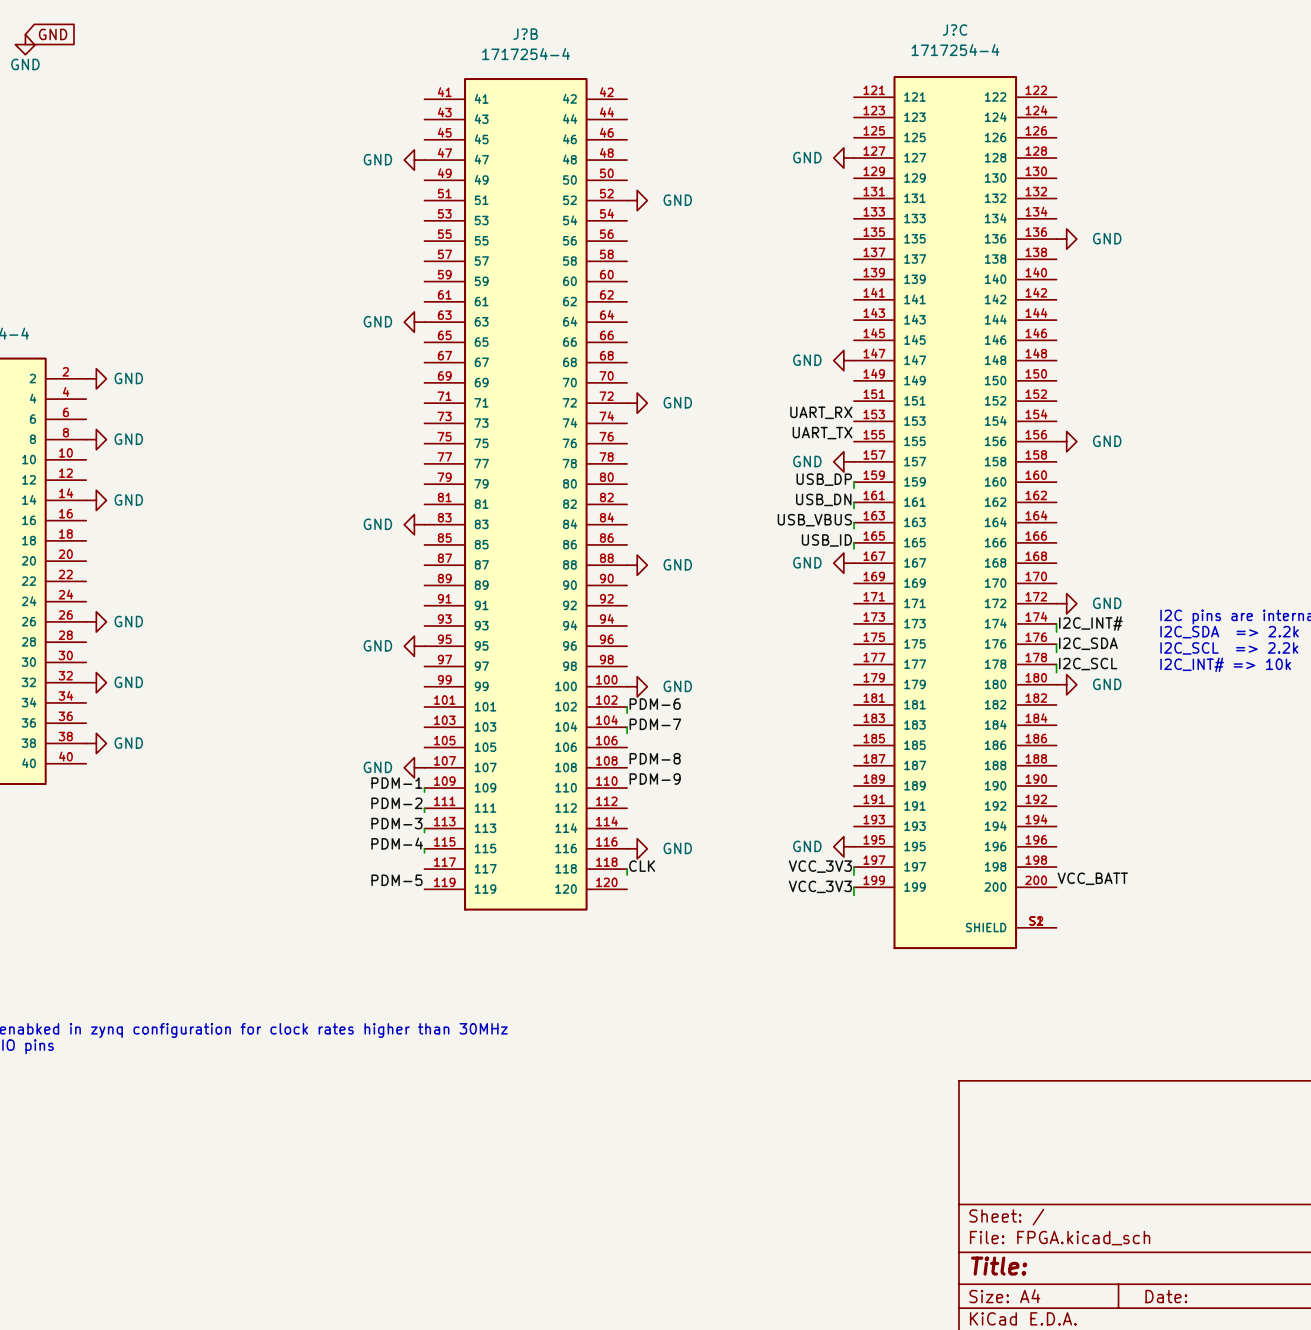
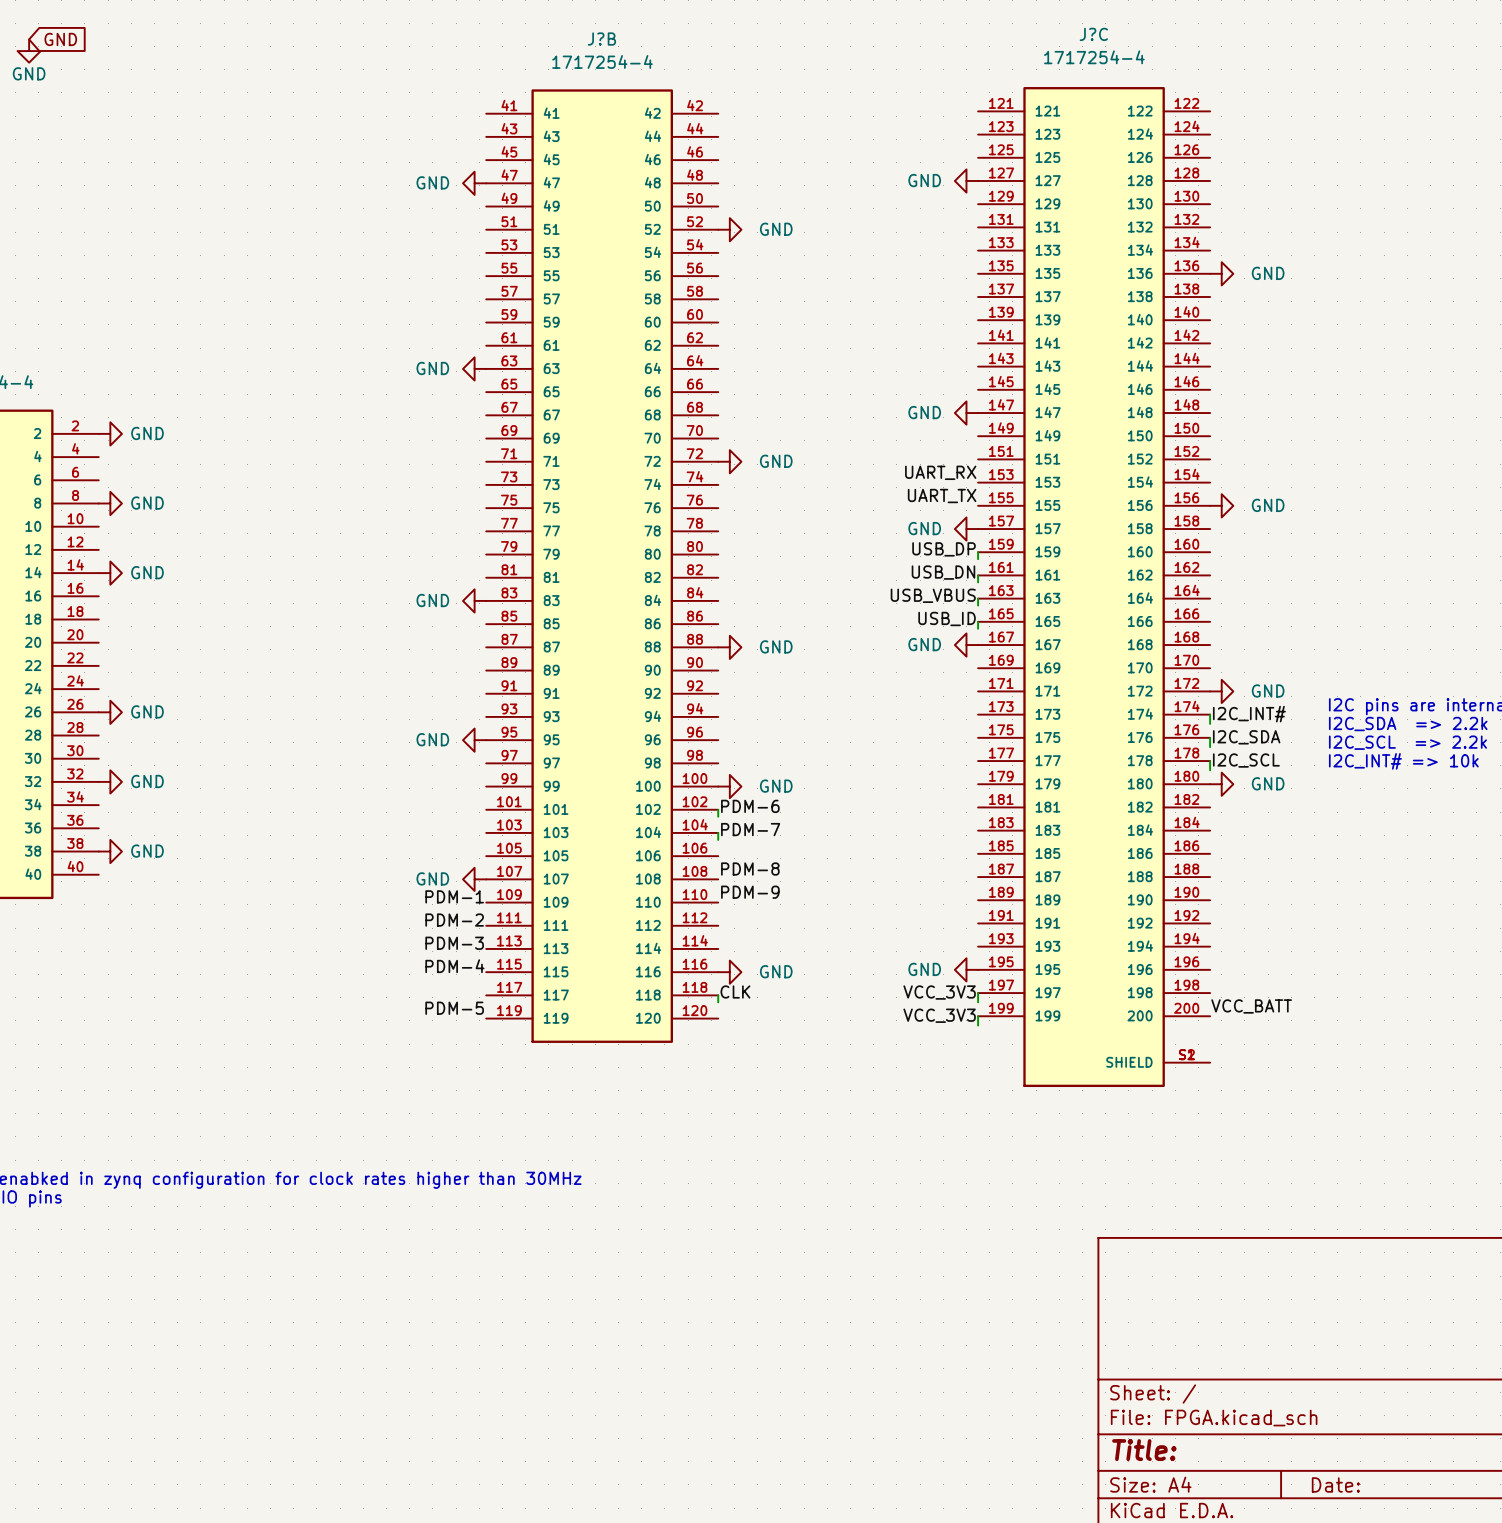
wire: (424, 788) (424, 792) -> none
wire: (424, 808) (424, 812) -> none
wire: (424, 828) (424, 832) -> none
wire: (424, 848) (424, 852) -> none

